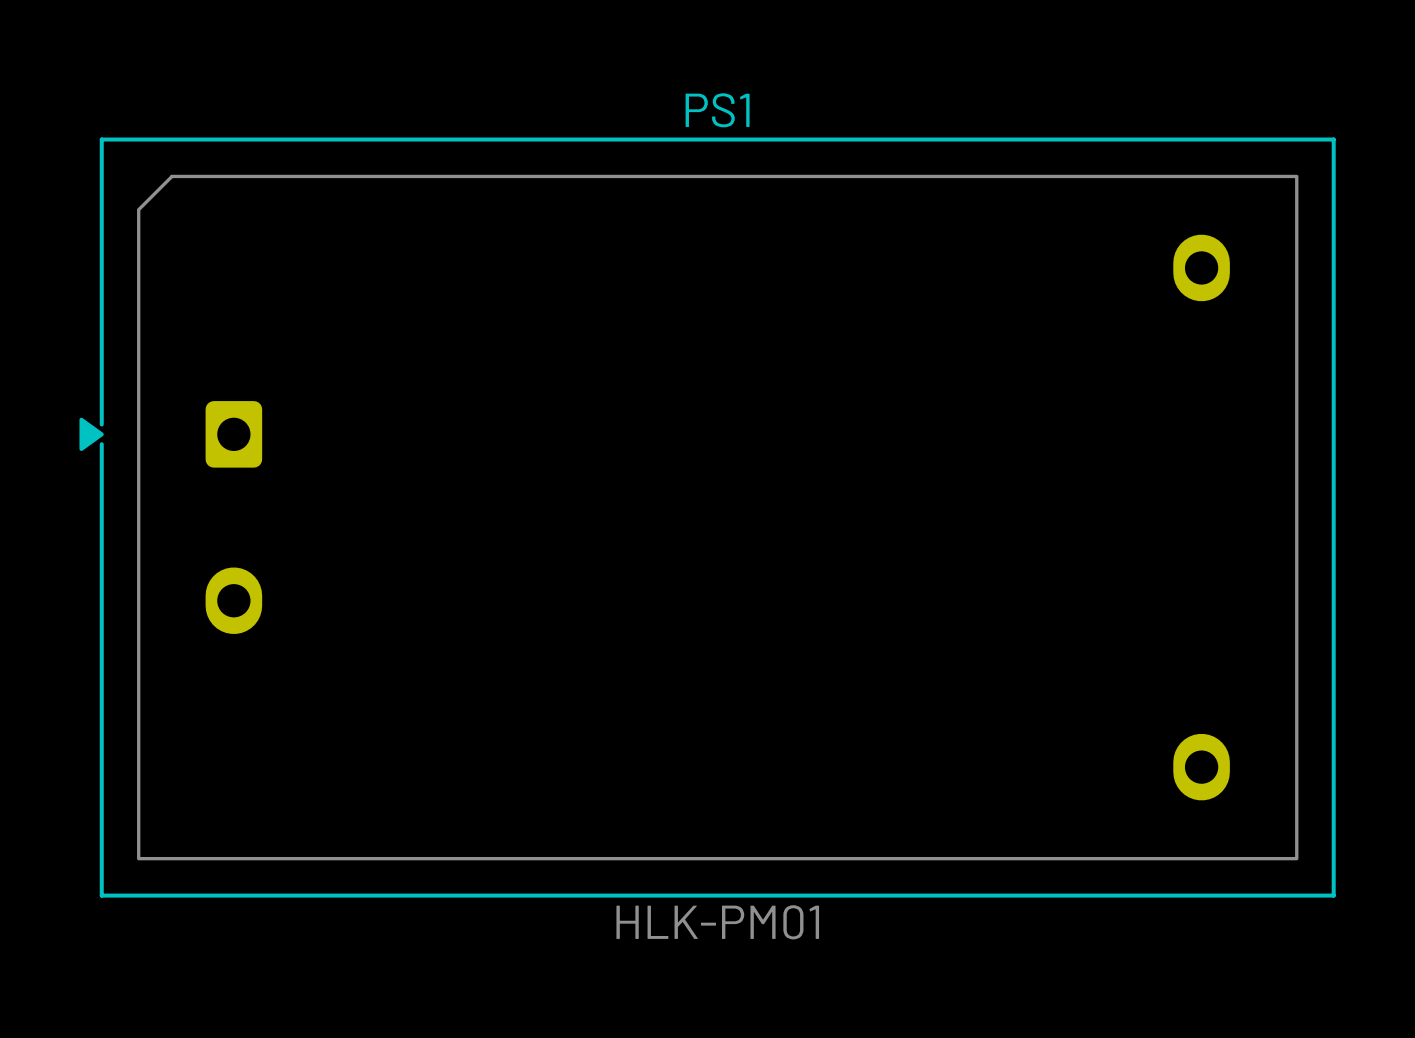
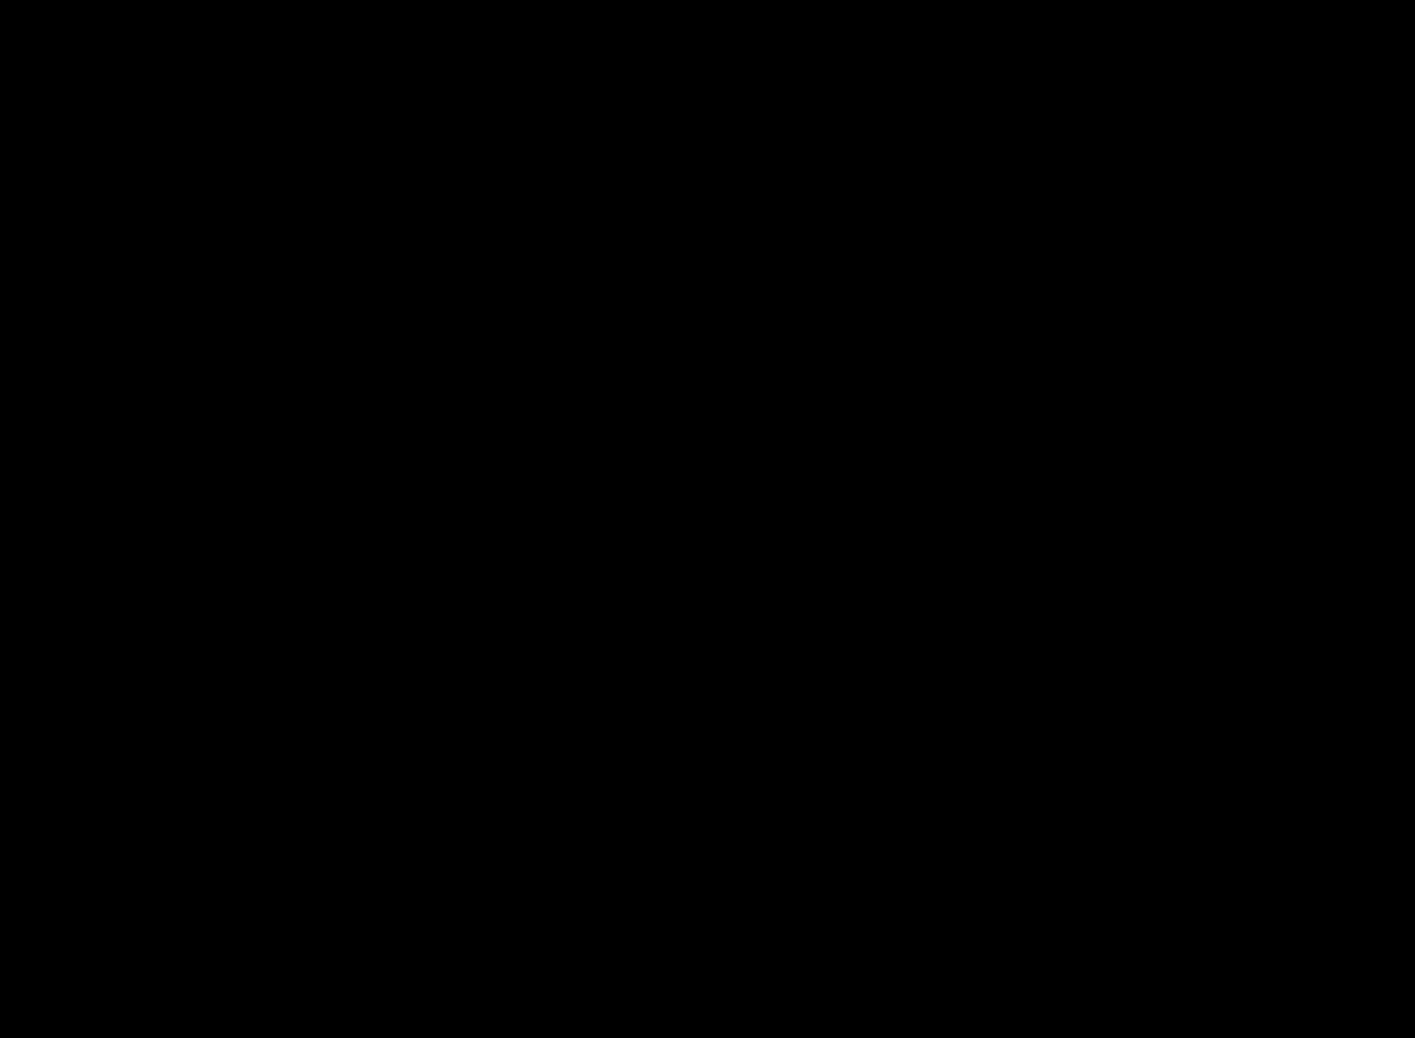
PS1: HLK-PM01 (707, 517) -> none

